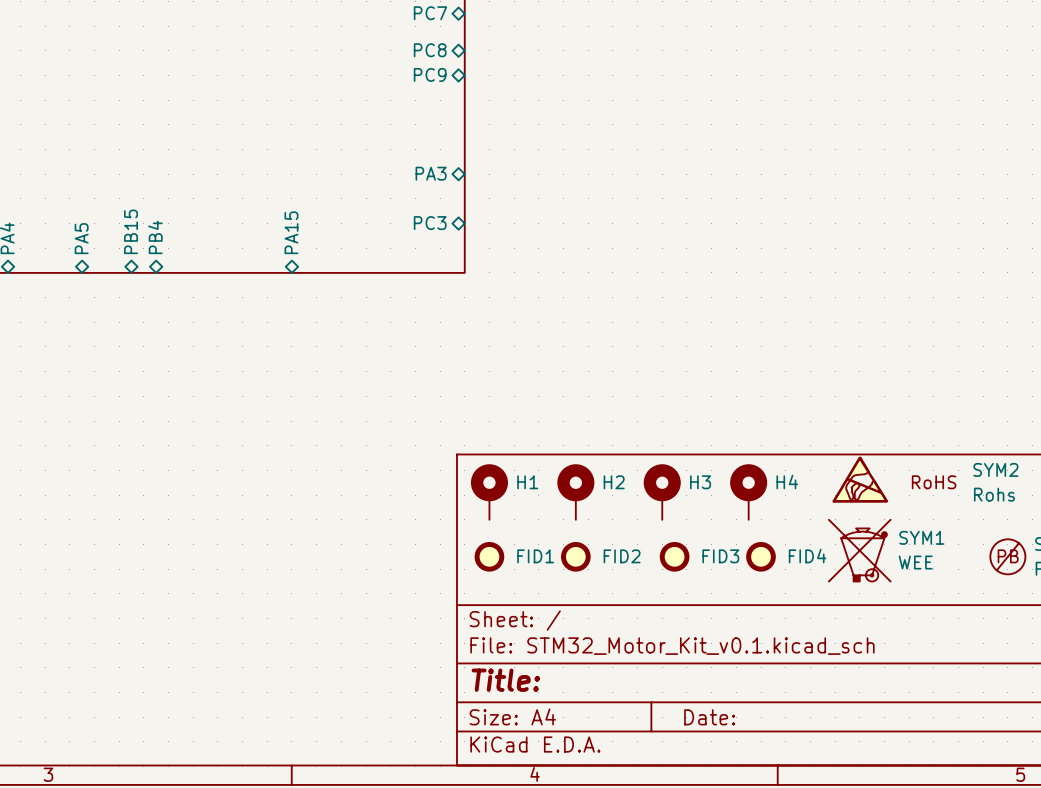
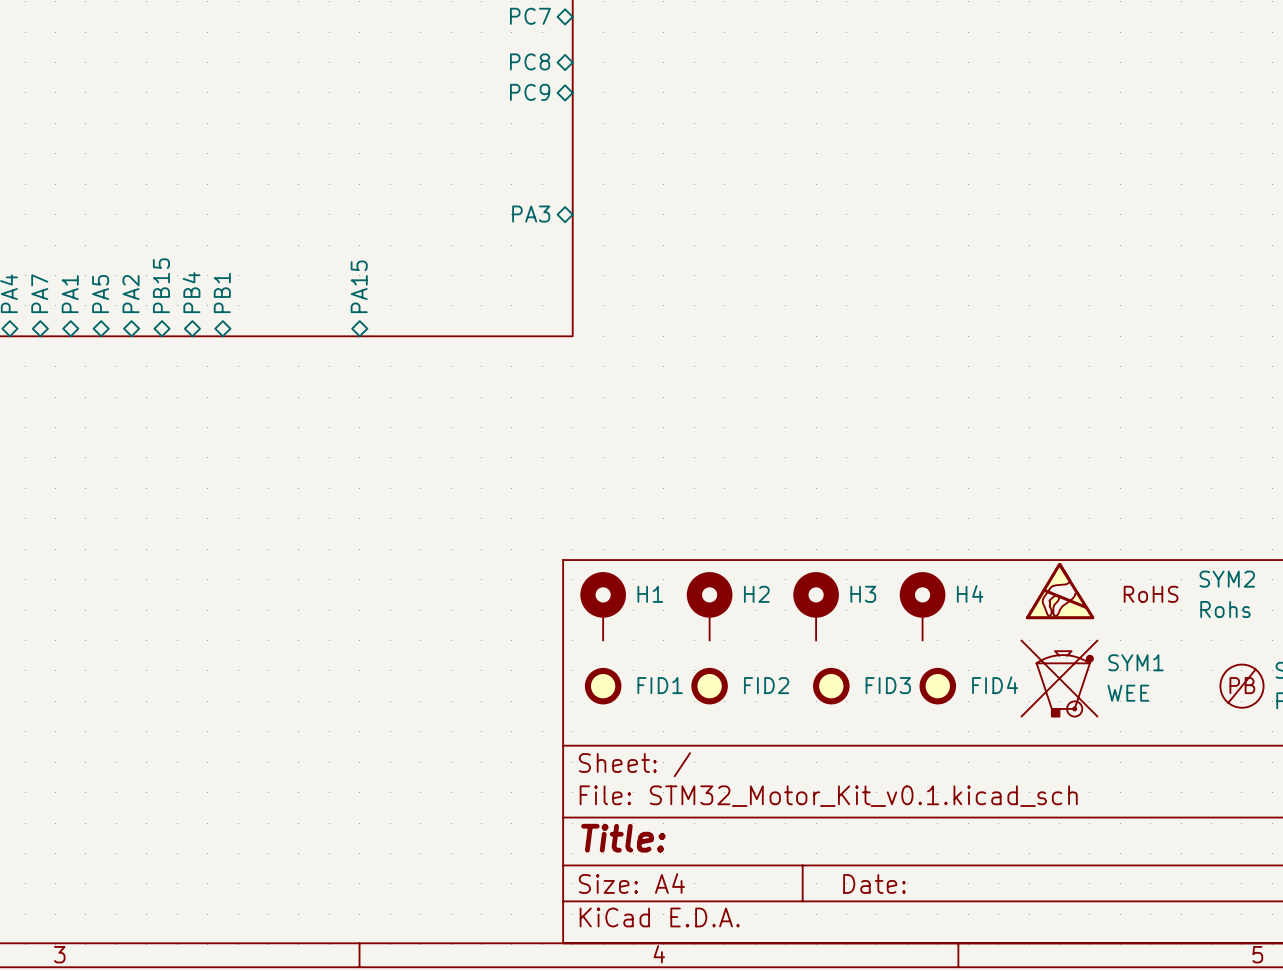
sheet pin: PC3 (430, 223) -> none
sheet pin: none -> PB1 (222, 292)
sheet pin: none -> PA7 (39, 293)
sheet pin: none -> PA1 (70, 294)
sheet pin: none -> PA2 (131, 294)

